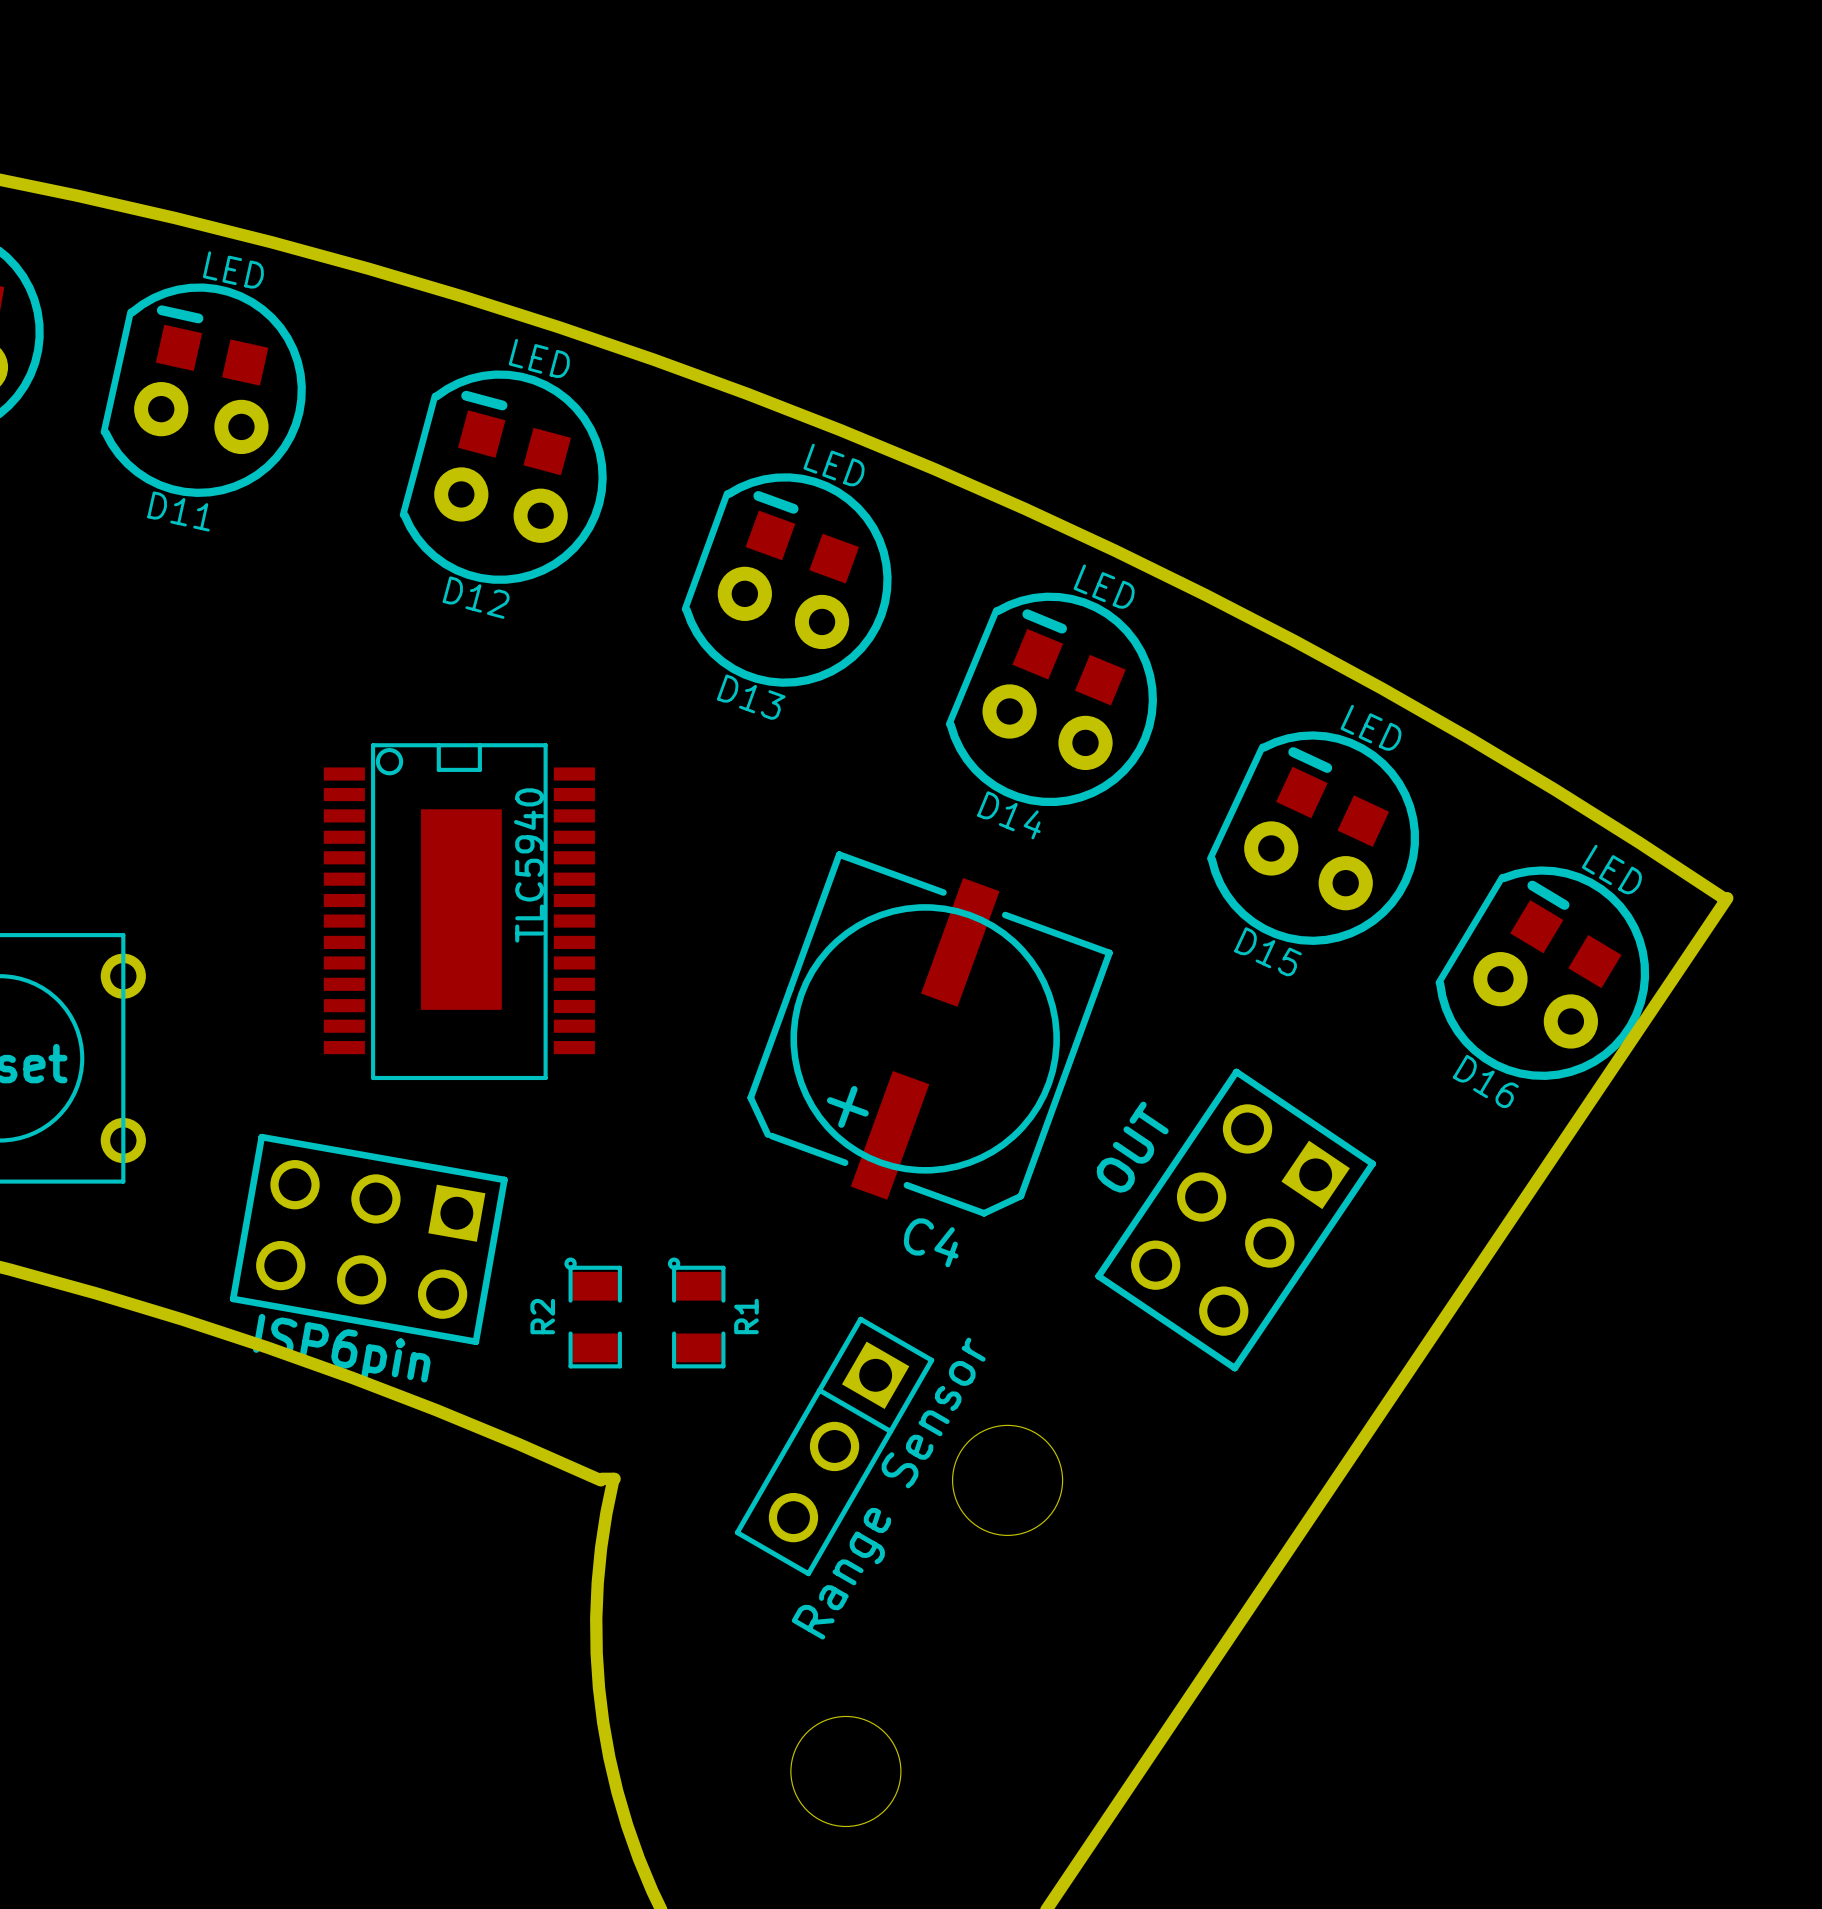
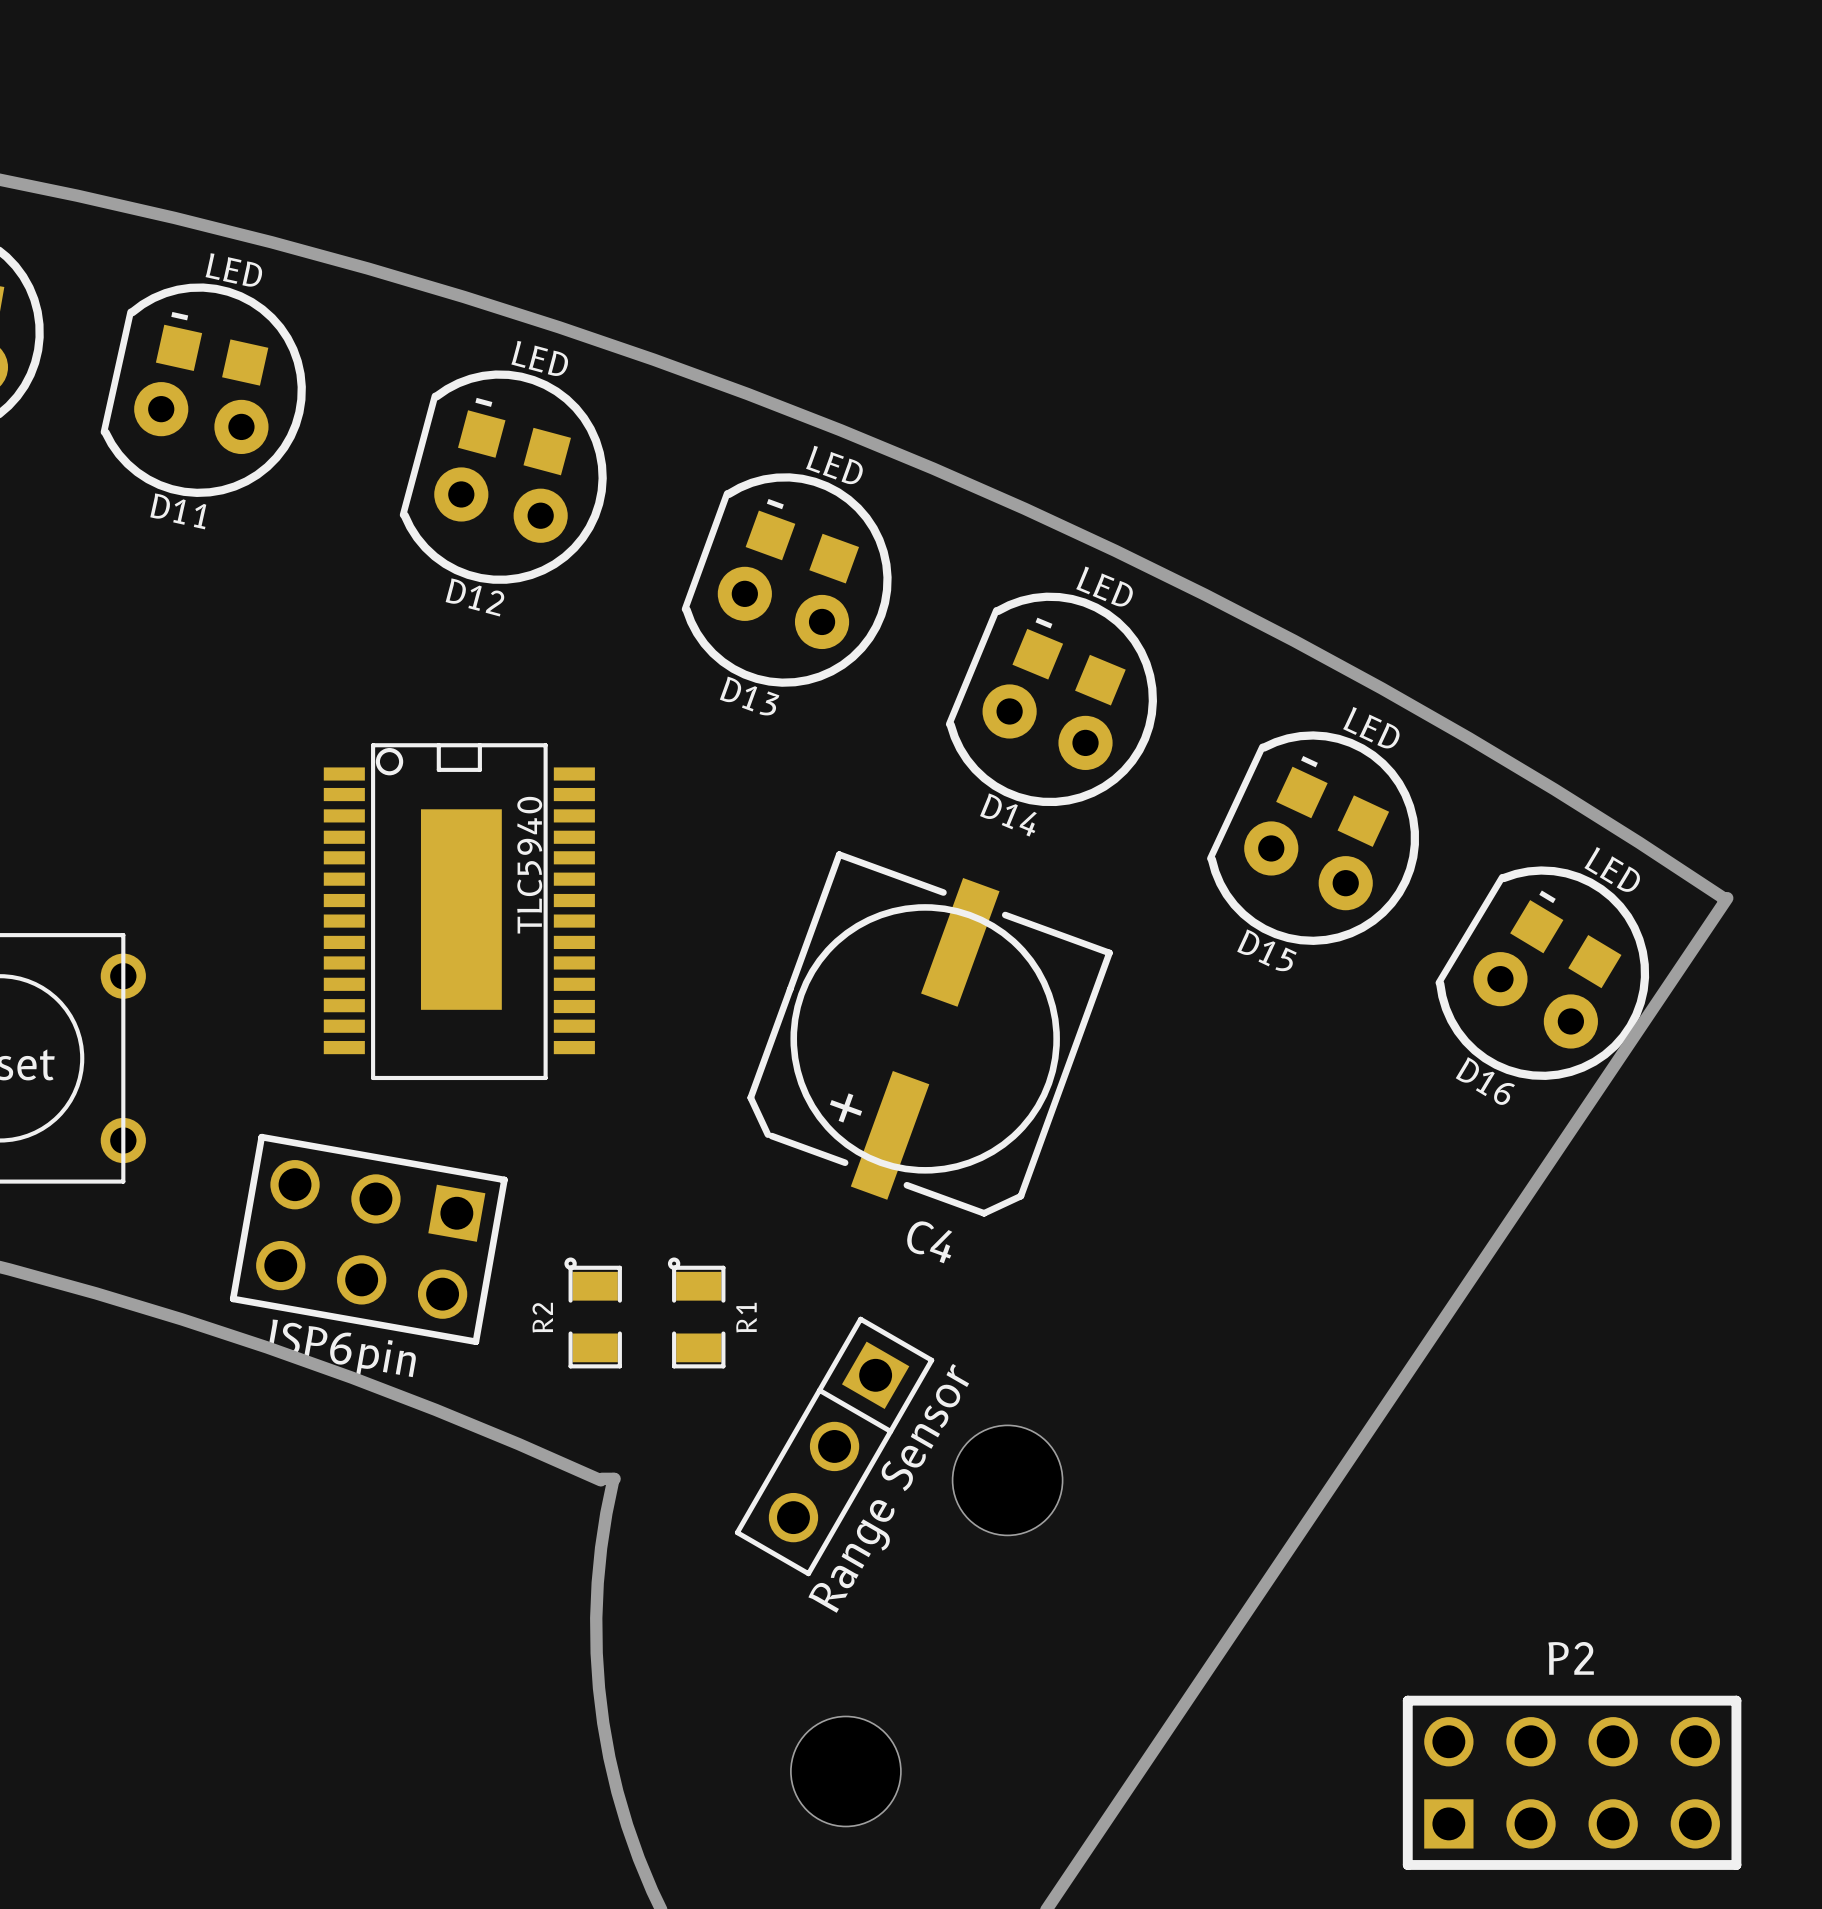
OUT: (1235, 1220) -> none
P2: none -> (1572, 1782)

